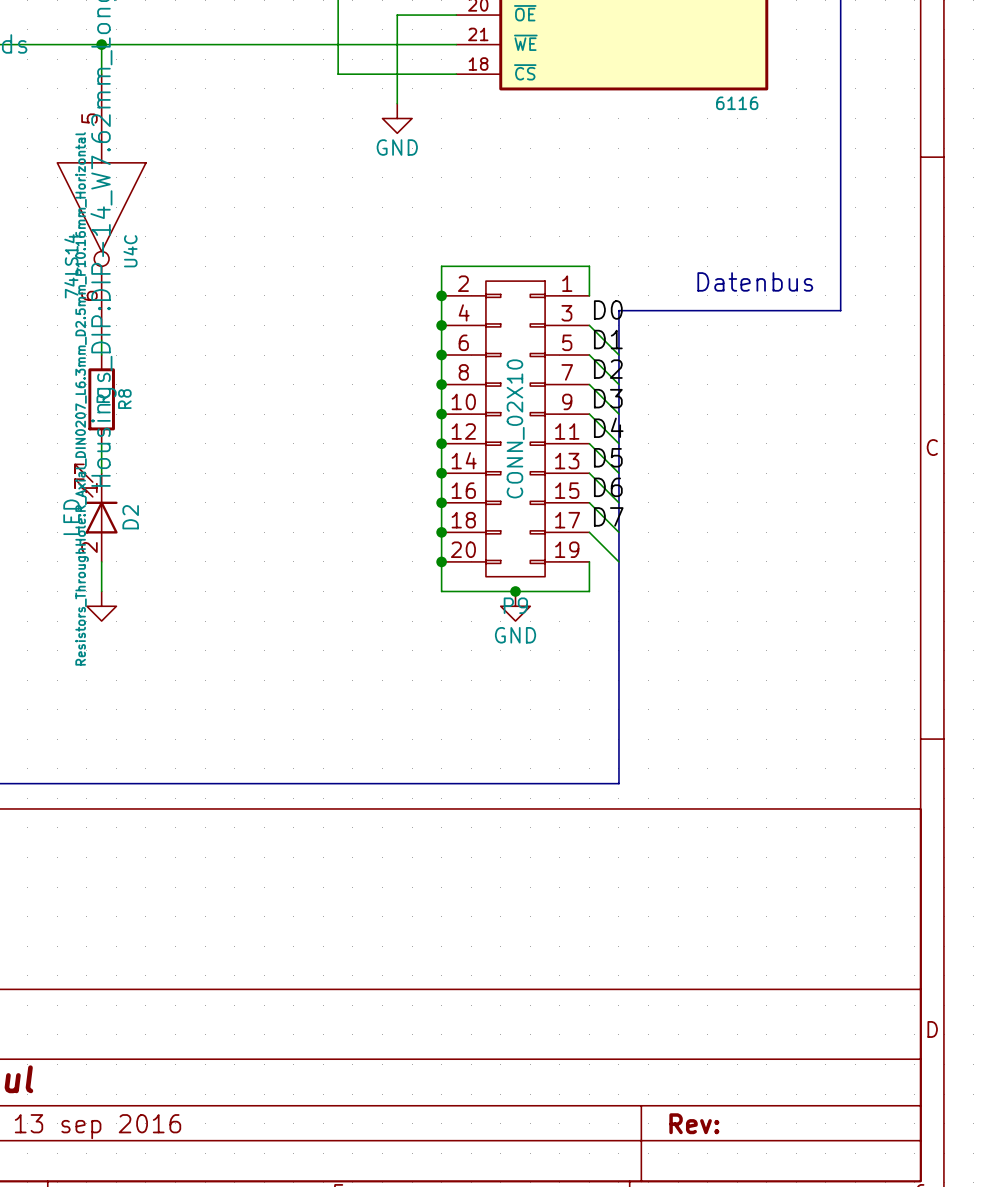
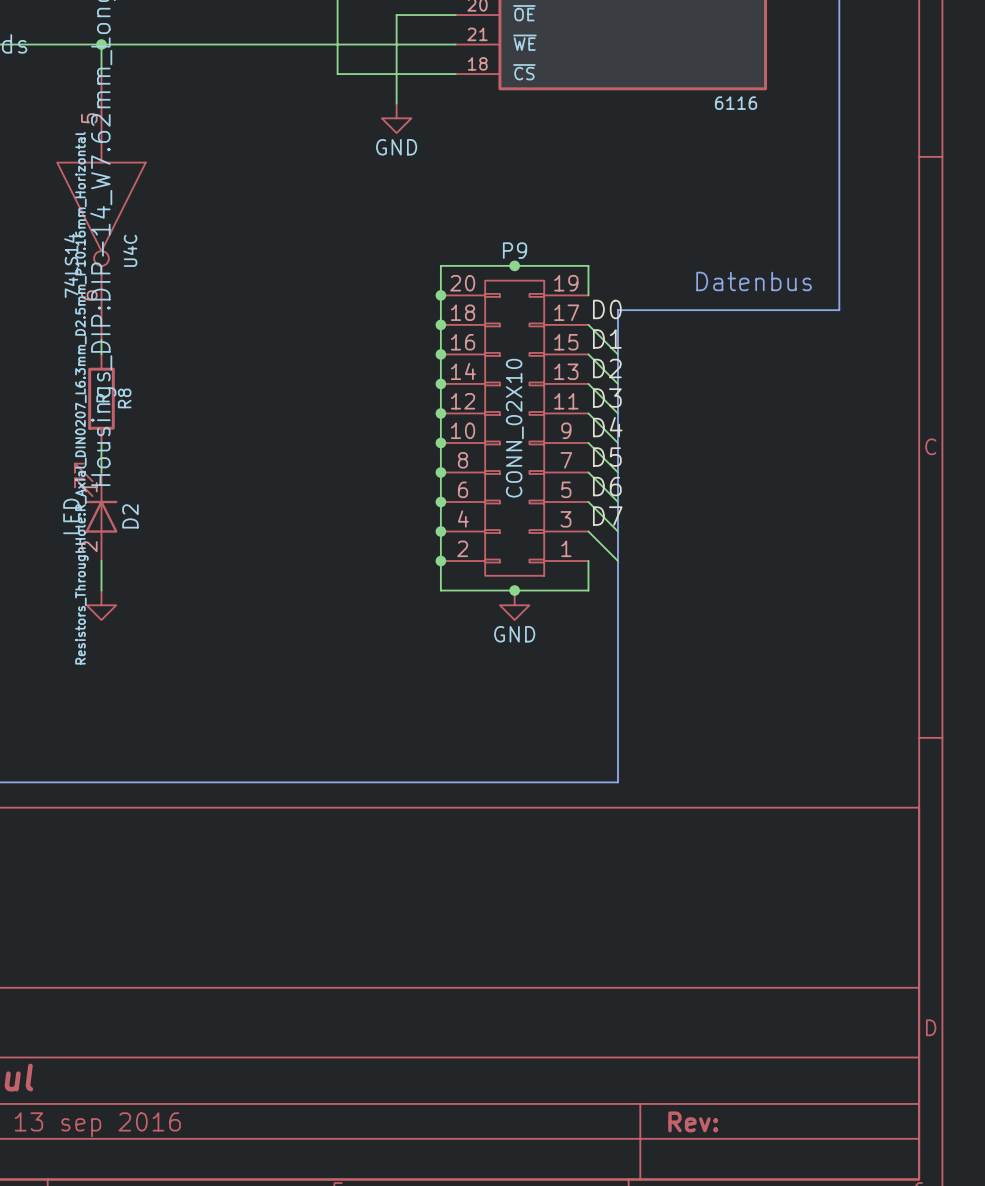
junction: none -> (514, 265)
P9 flip: as is (515, 428) -> up-down (514, 428)

